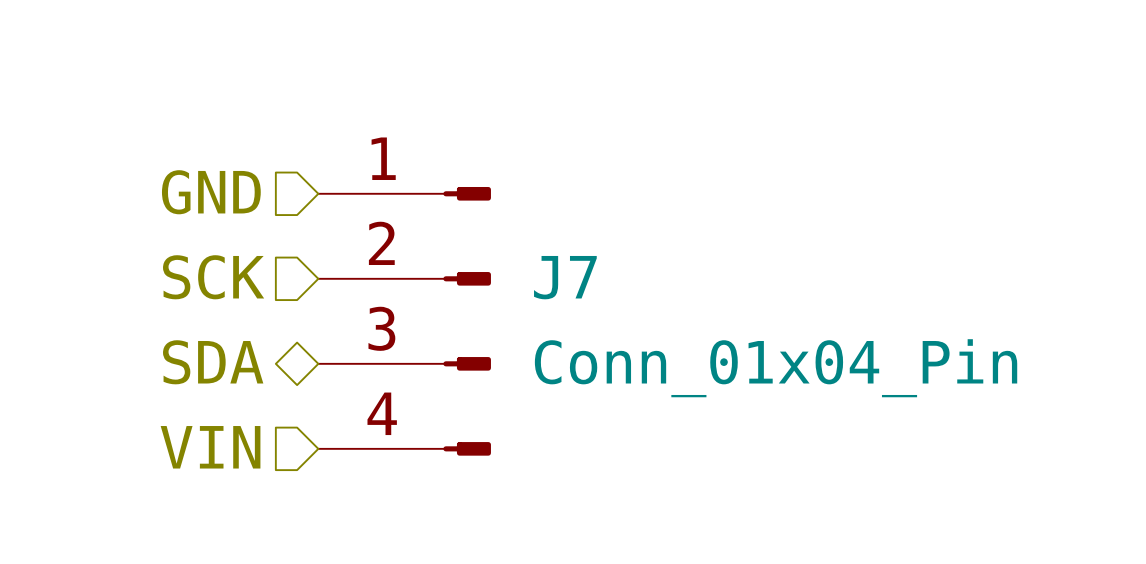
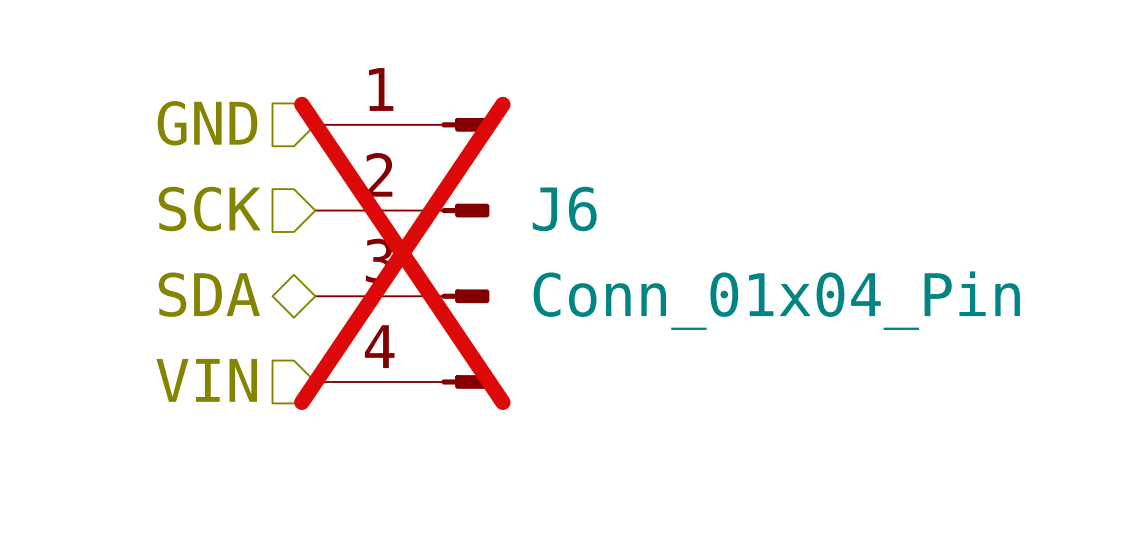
J7 name: J7 (565, 277) -> J6 (564, 208)
J7 do-not-place cross: none -> (402, 253)

